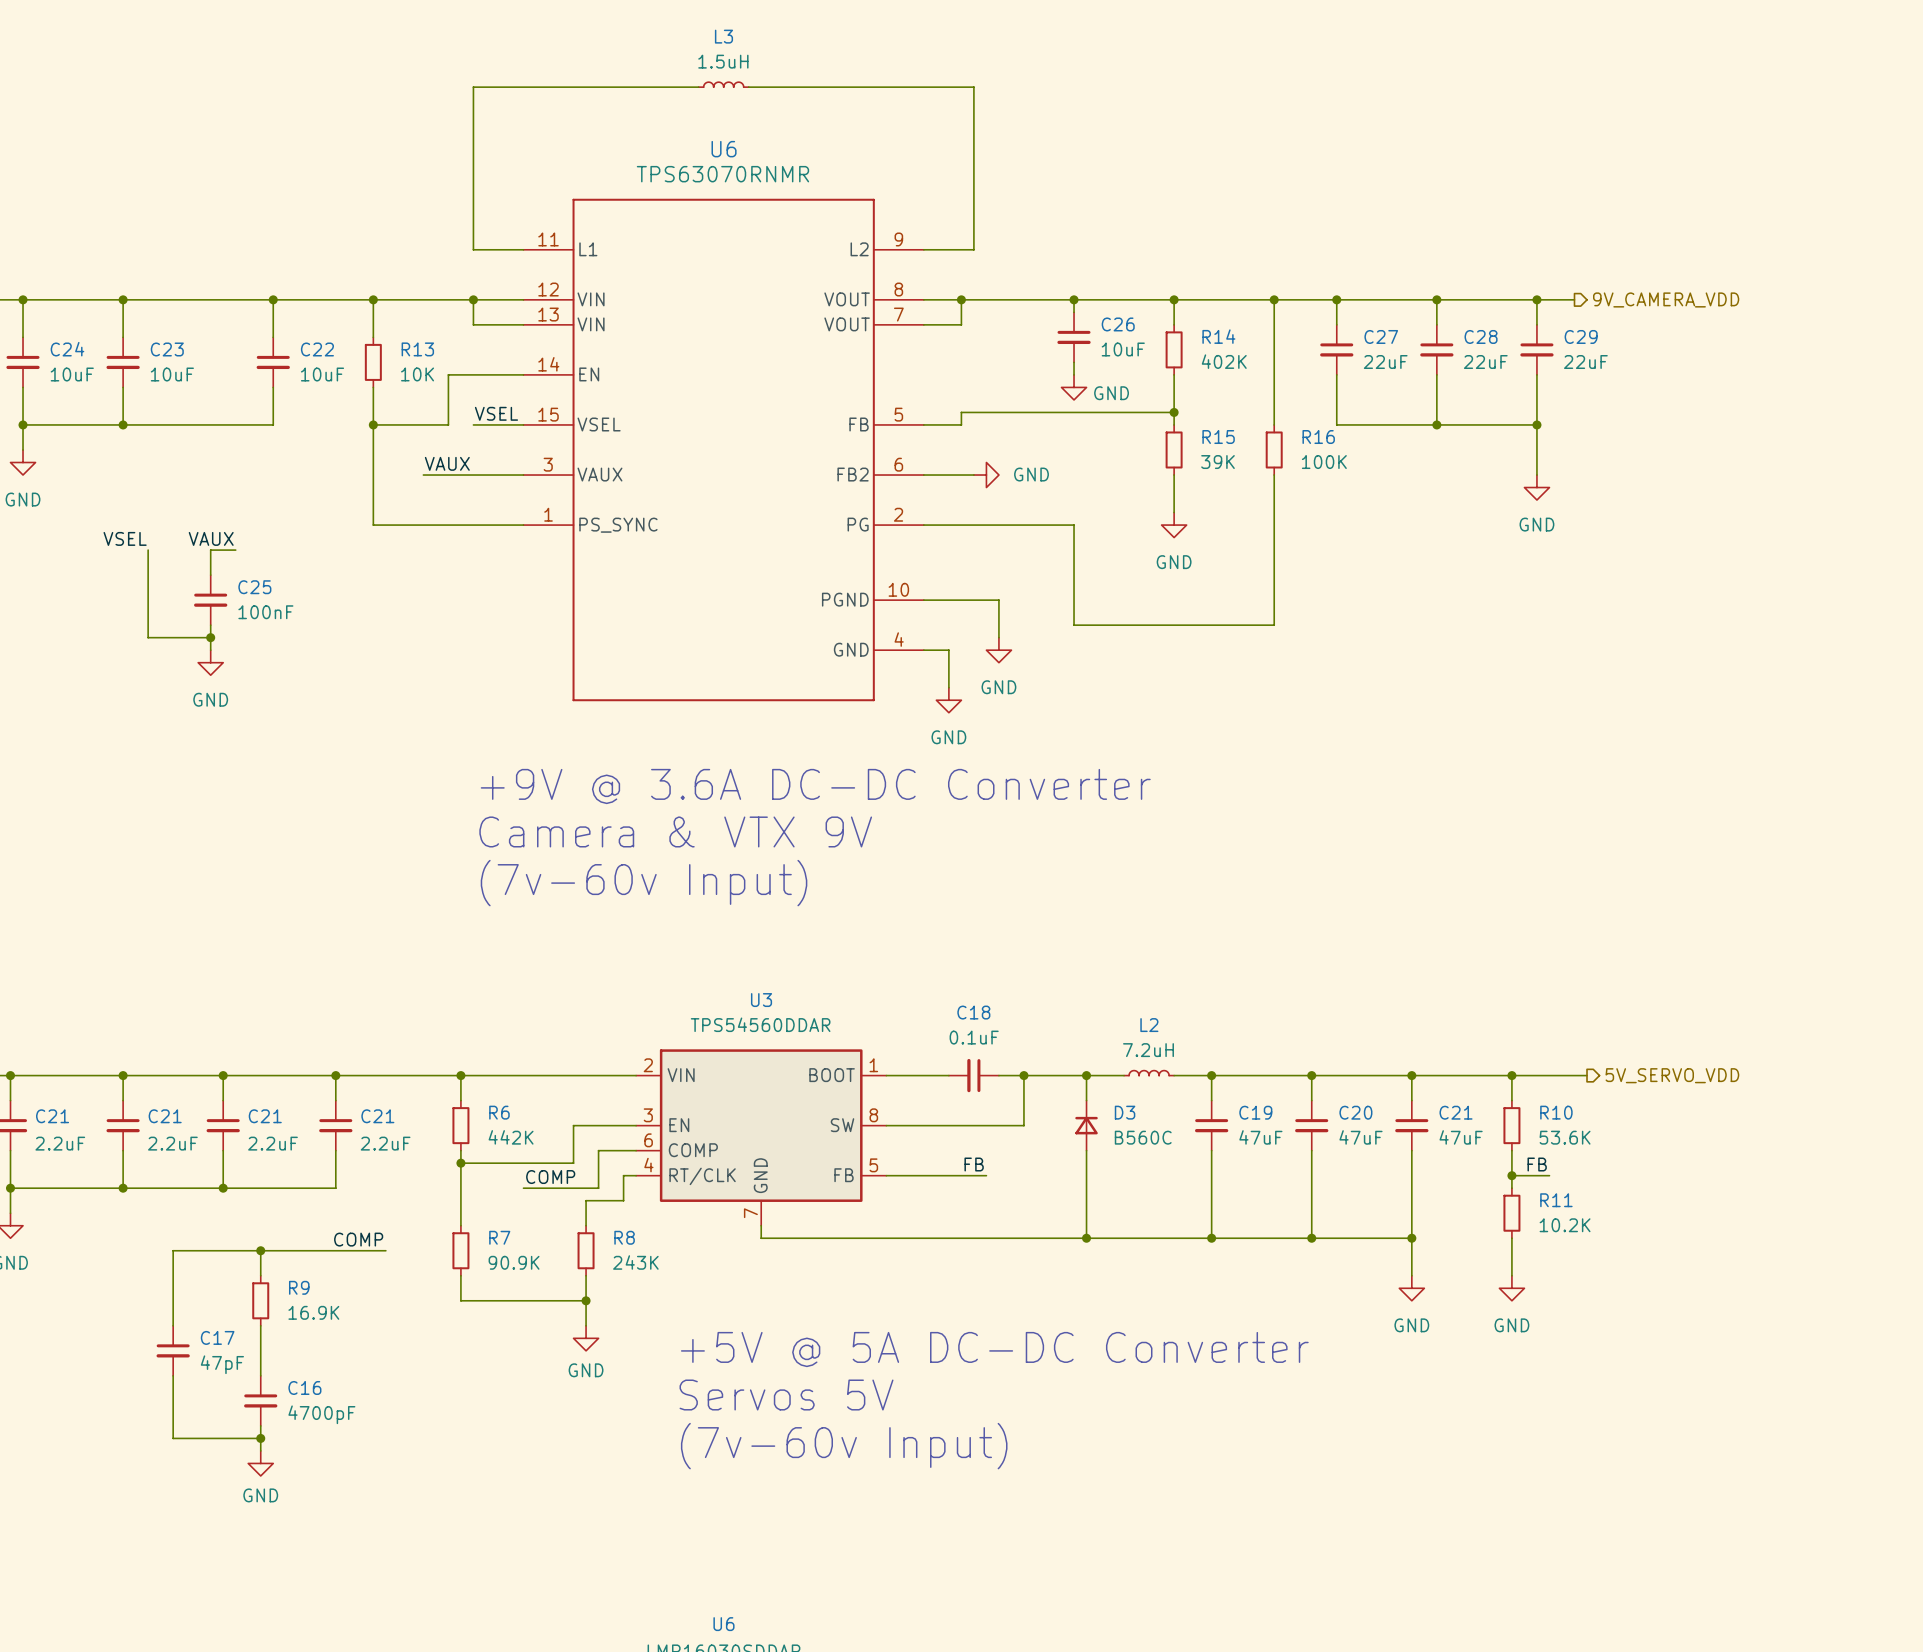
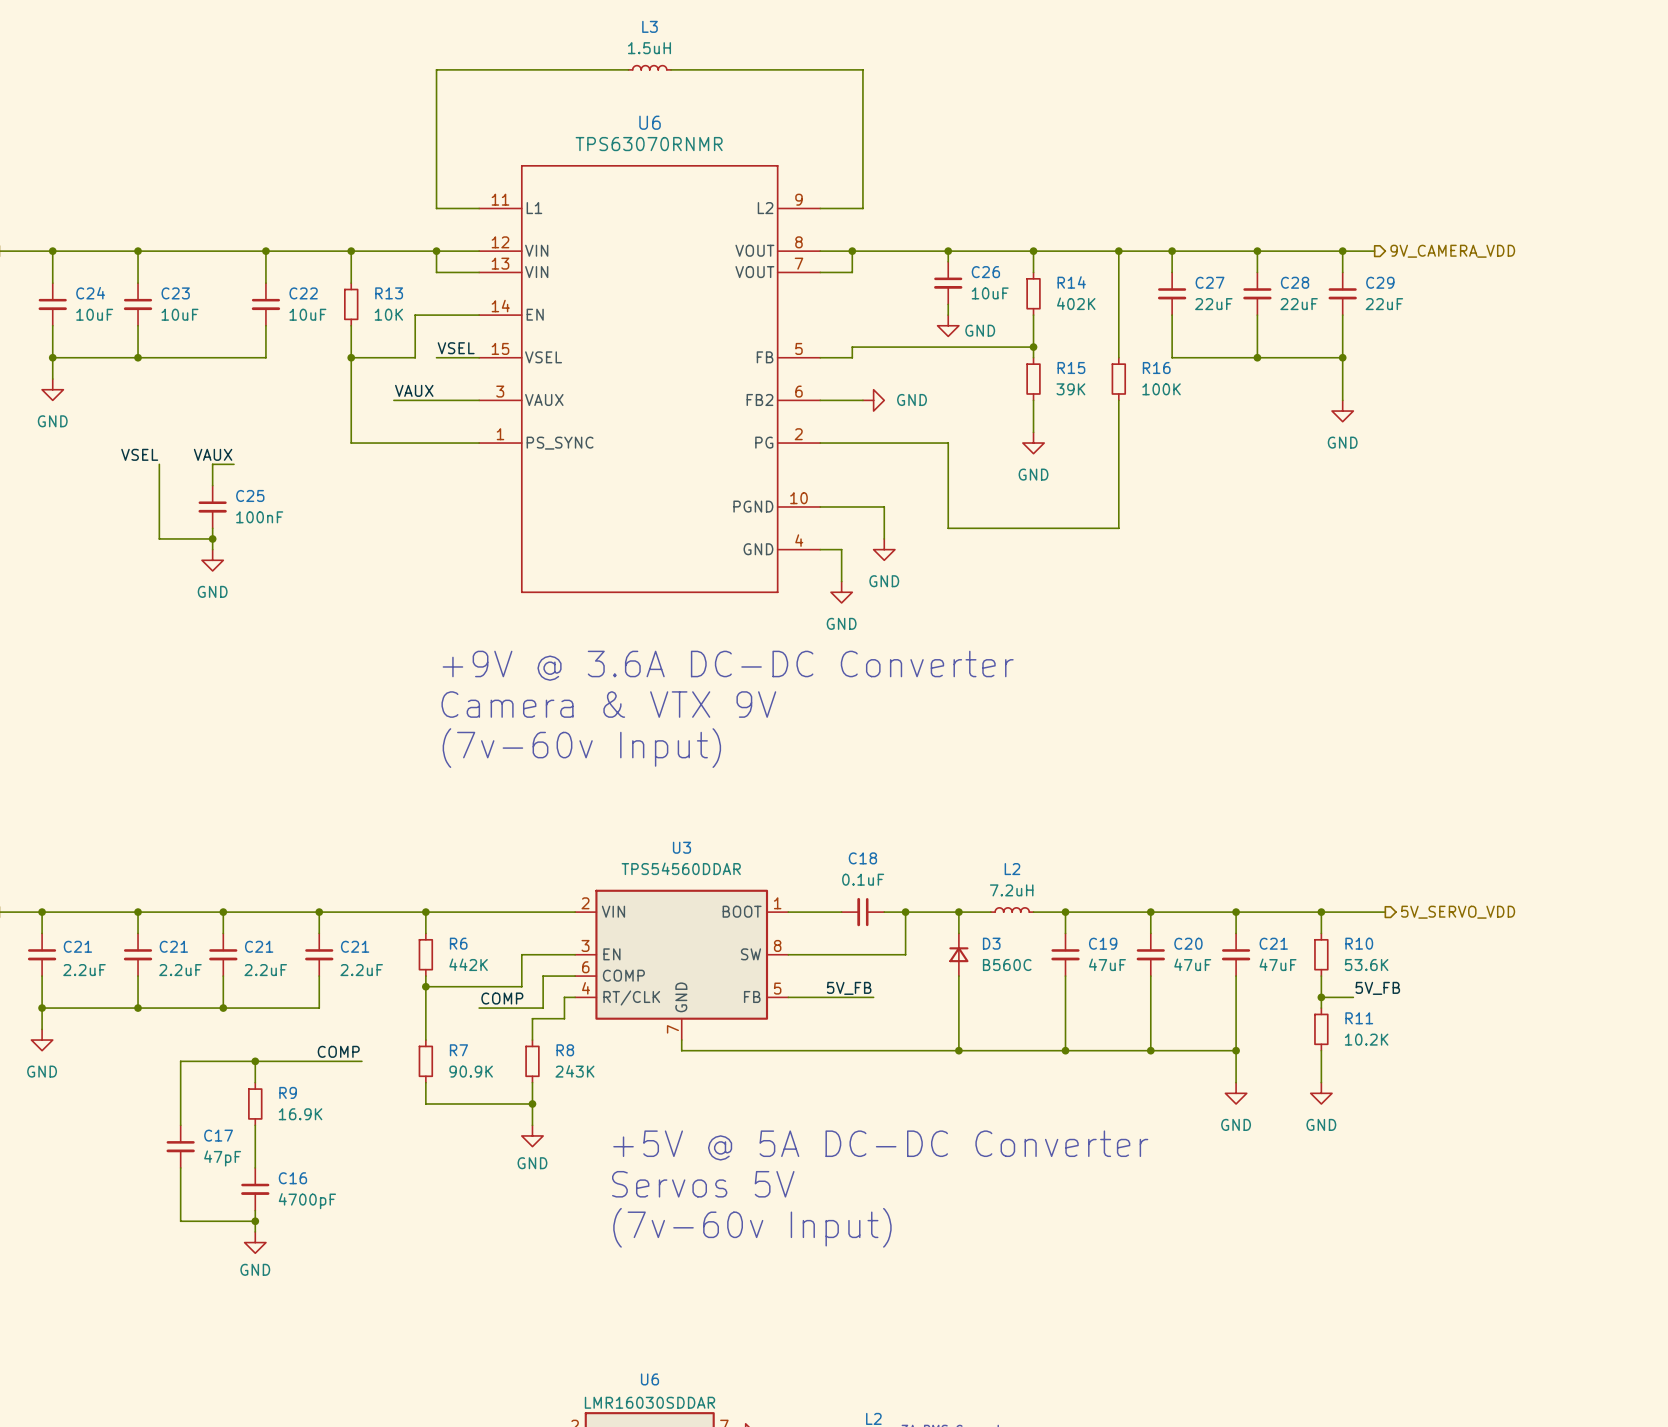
label: FB (974, 1164) -> 5V_FB (849, 988)
label: FB (1537, 1164) -> 5V_FB (1377, 988)

